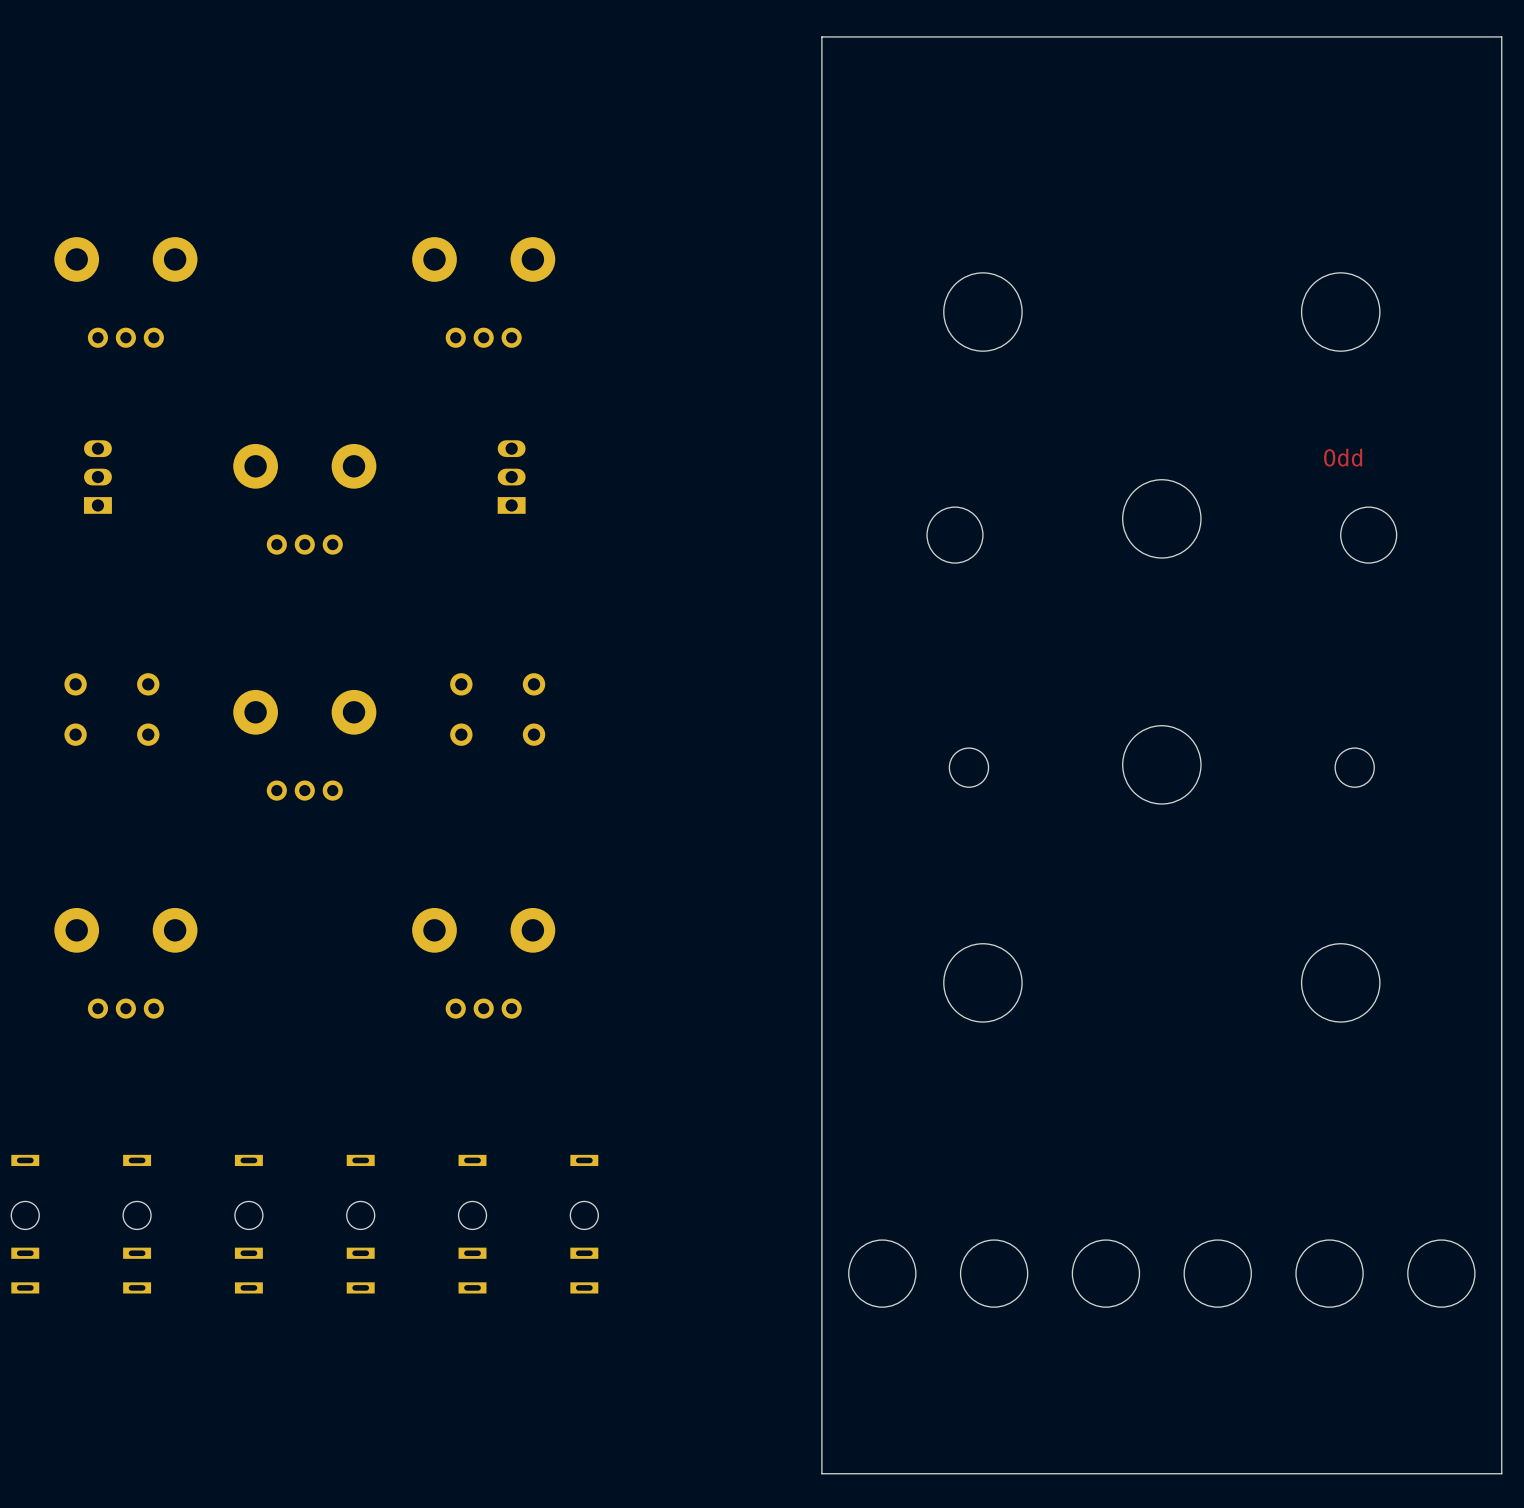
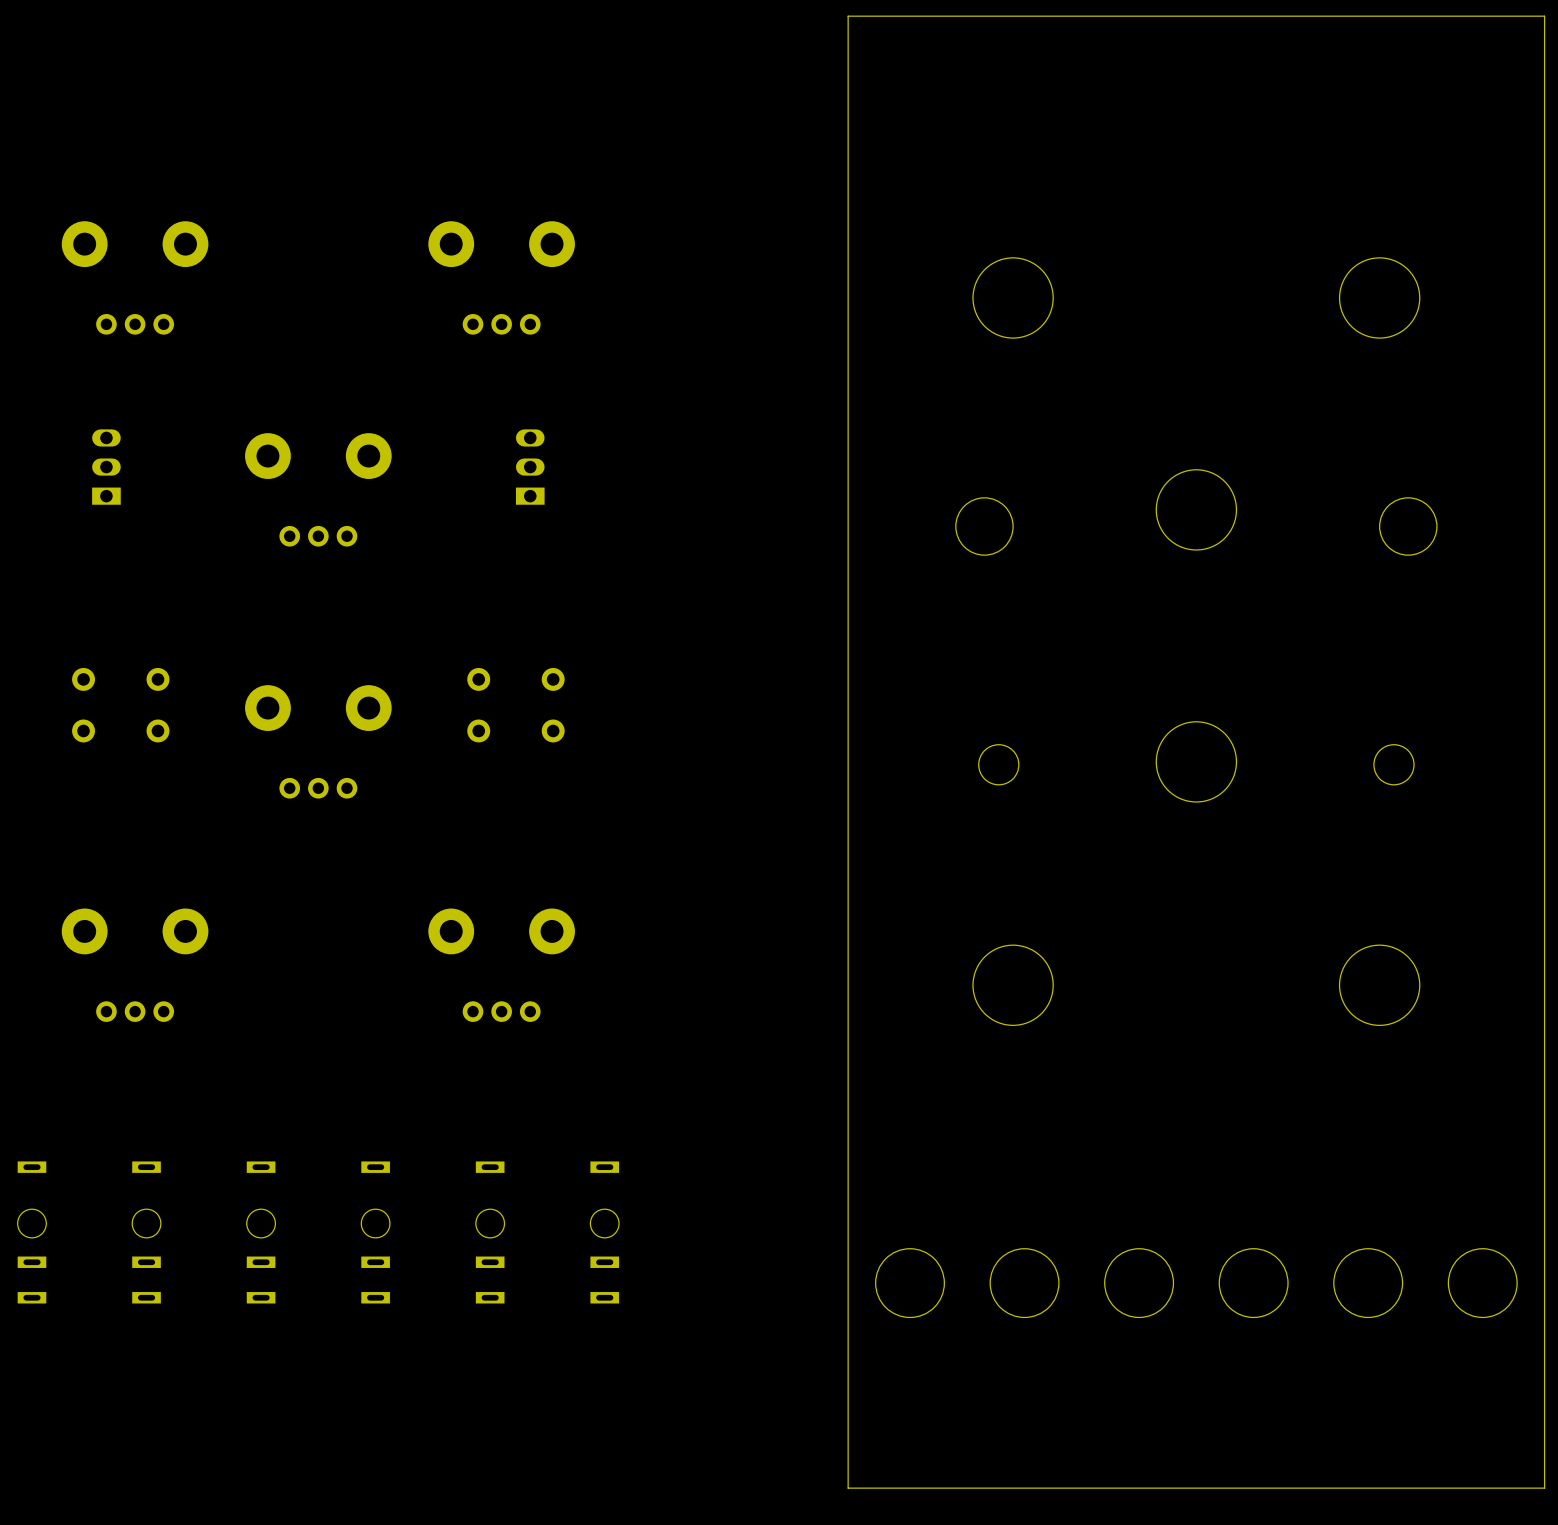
text: Odd (1343, 457) -> none

